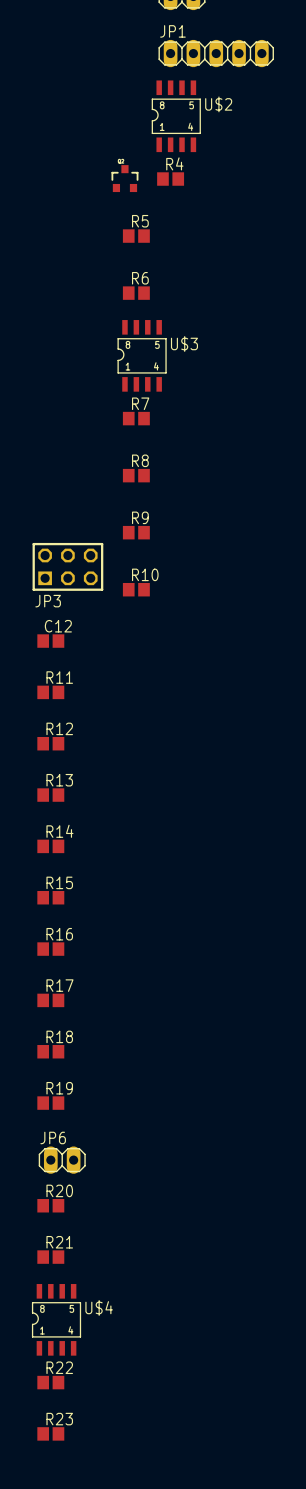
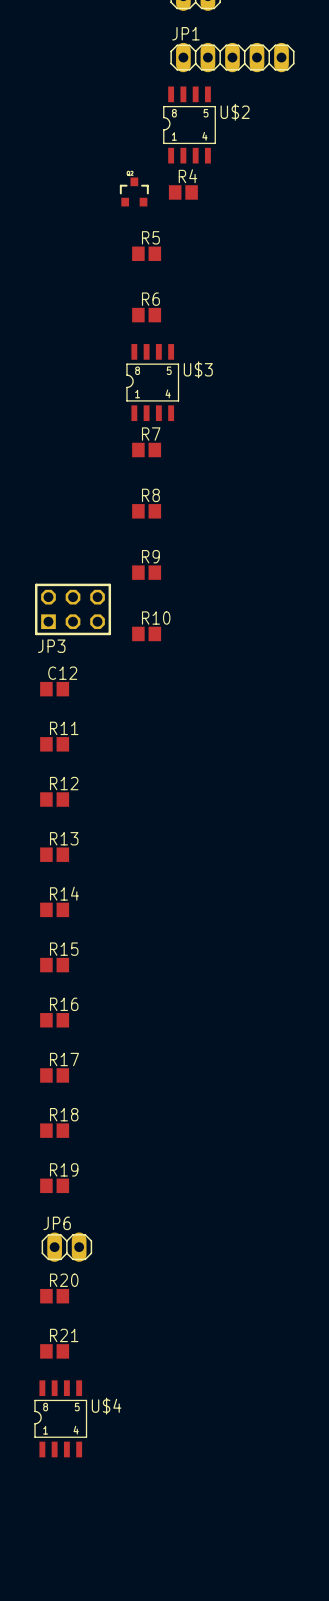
R22: (50, 1382) -> none
R23: (50, 1433) -> none

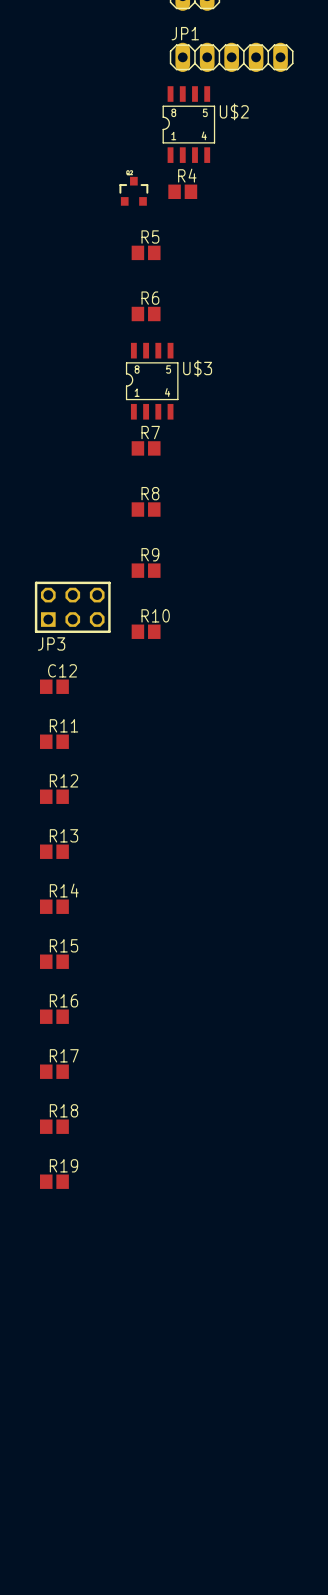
JP6: (66, 1247) -> none
R20: (54, 1296) -> none
R21: (54, 1351) -> none
U$4: (60, 1418) -> none

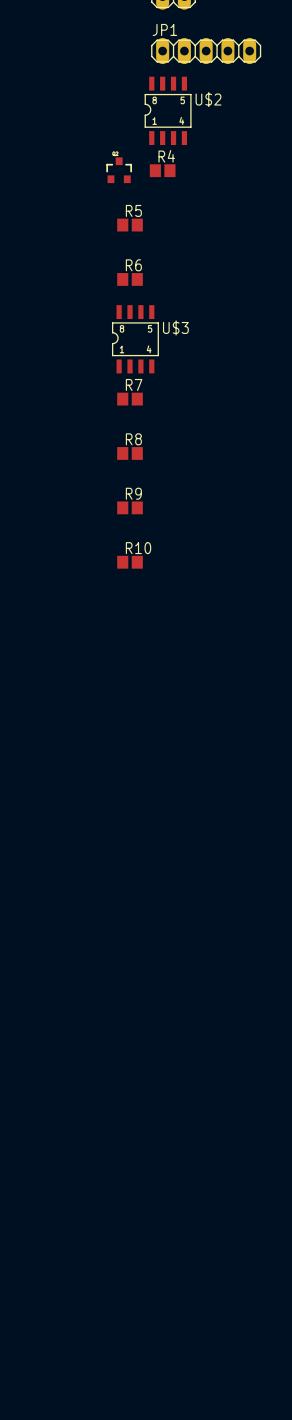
JP3: (72, 607) -> none
C12: (54, 686) -> none
R11: (54, 741) -> none
R12: (54, 796) -> none
R13: (54, 851) -> none
R14: (54, 906) -> none
R15: (54, 961) -> none
R16: (54, 1016) -> none
R17: (54, 1071) -> none
R18: (54, 1126) -> none
R19: (54, 1181) -> none

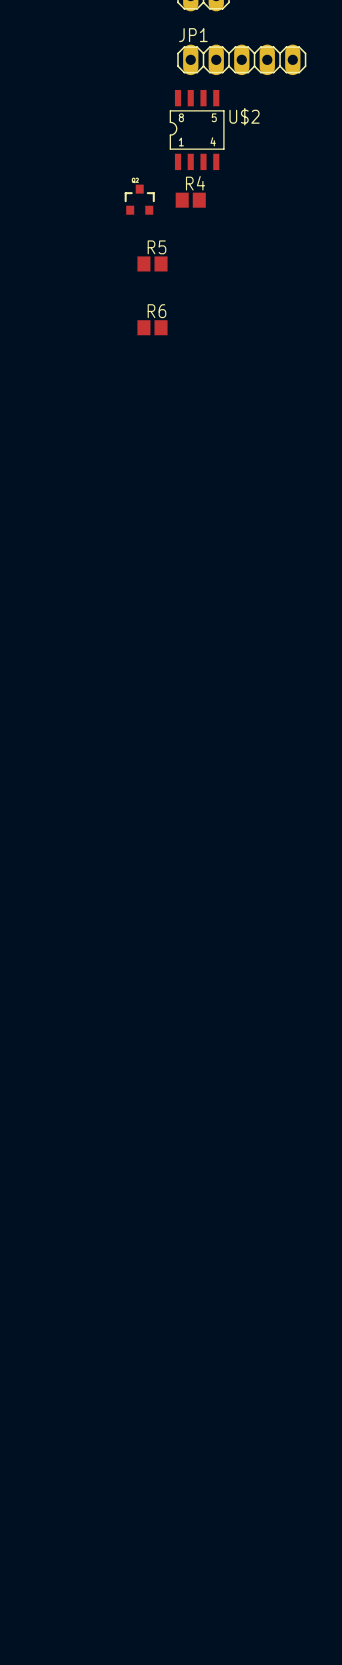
U$3: (135, 339) -> none
R7: (130, 399) -> none
R8: (130, 453) -> none
R9: (130, 507) -> none
R10: (130, 562) -> none

